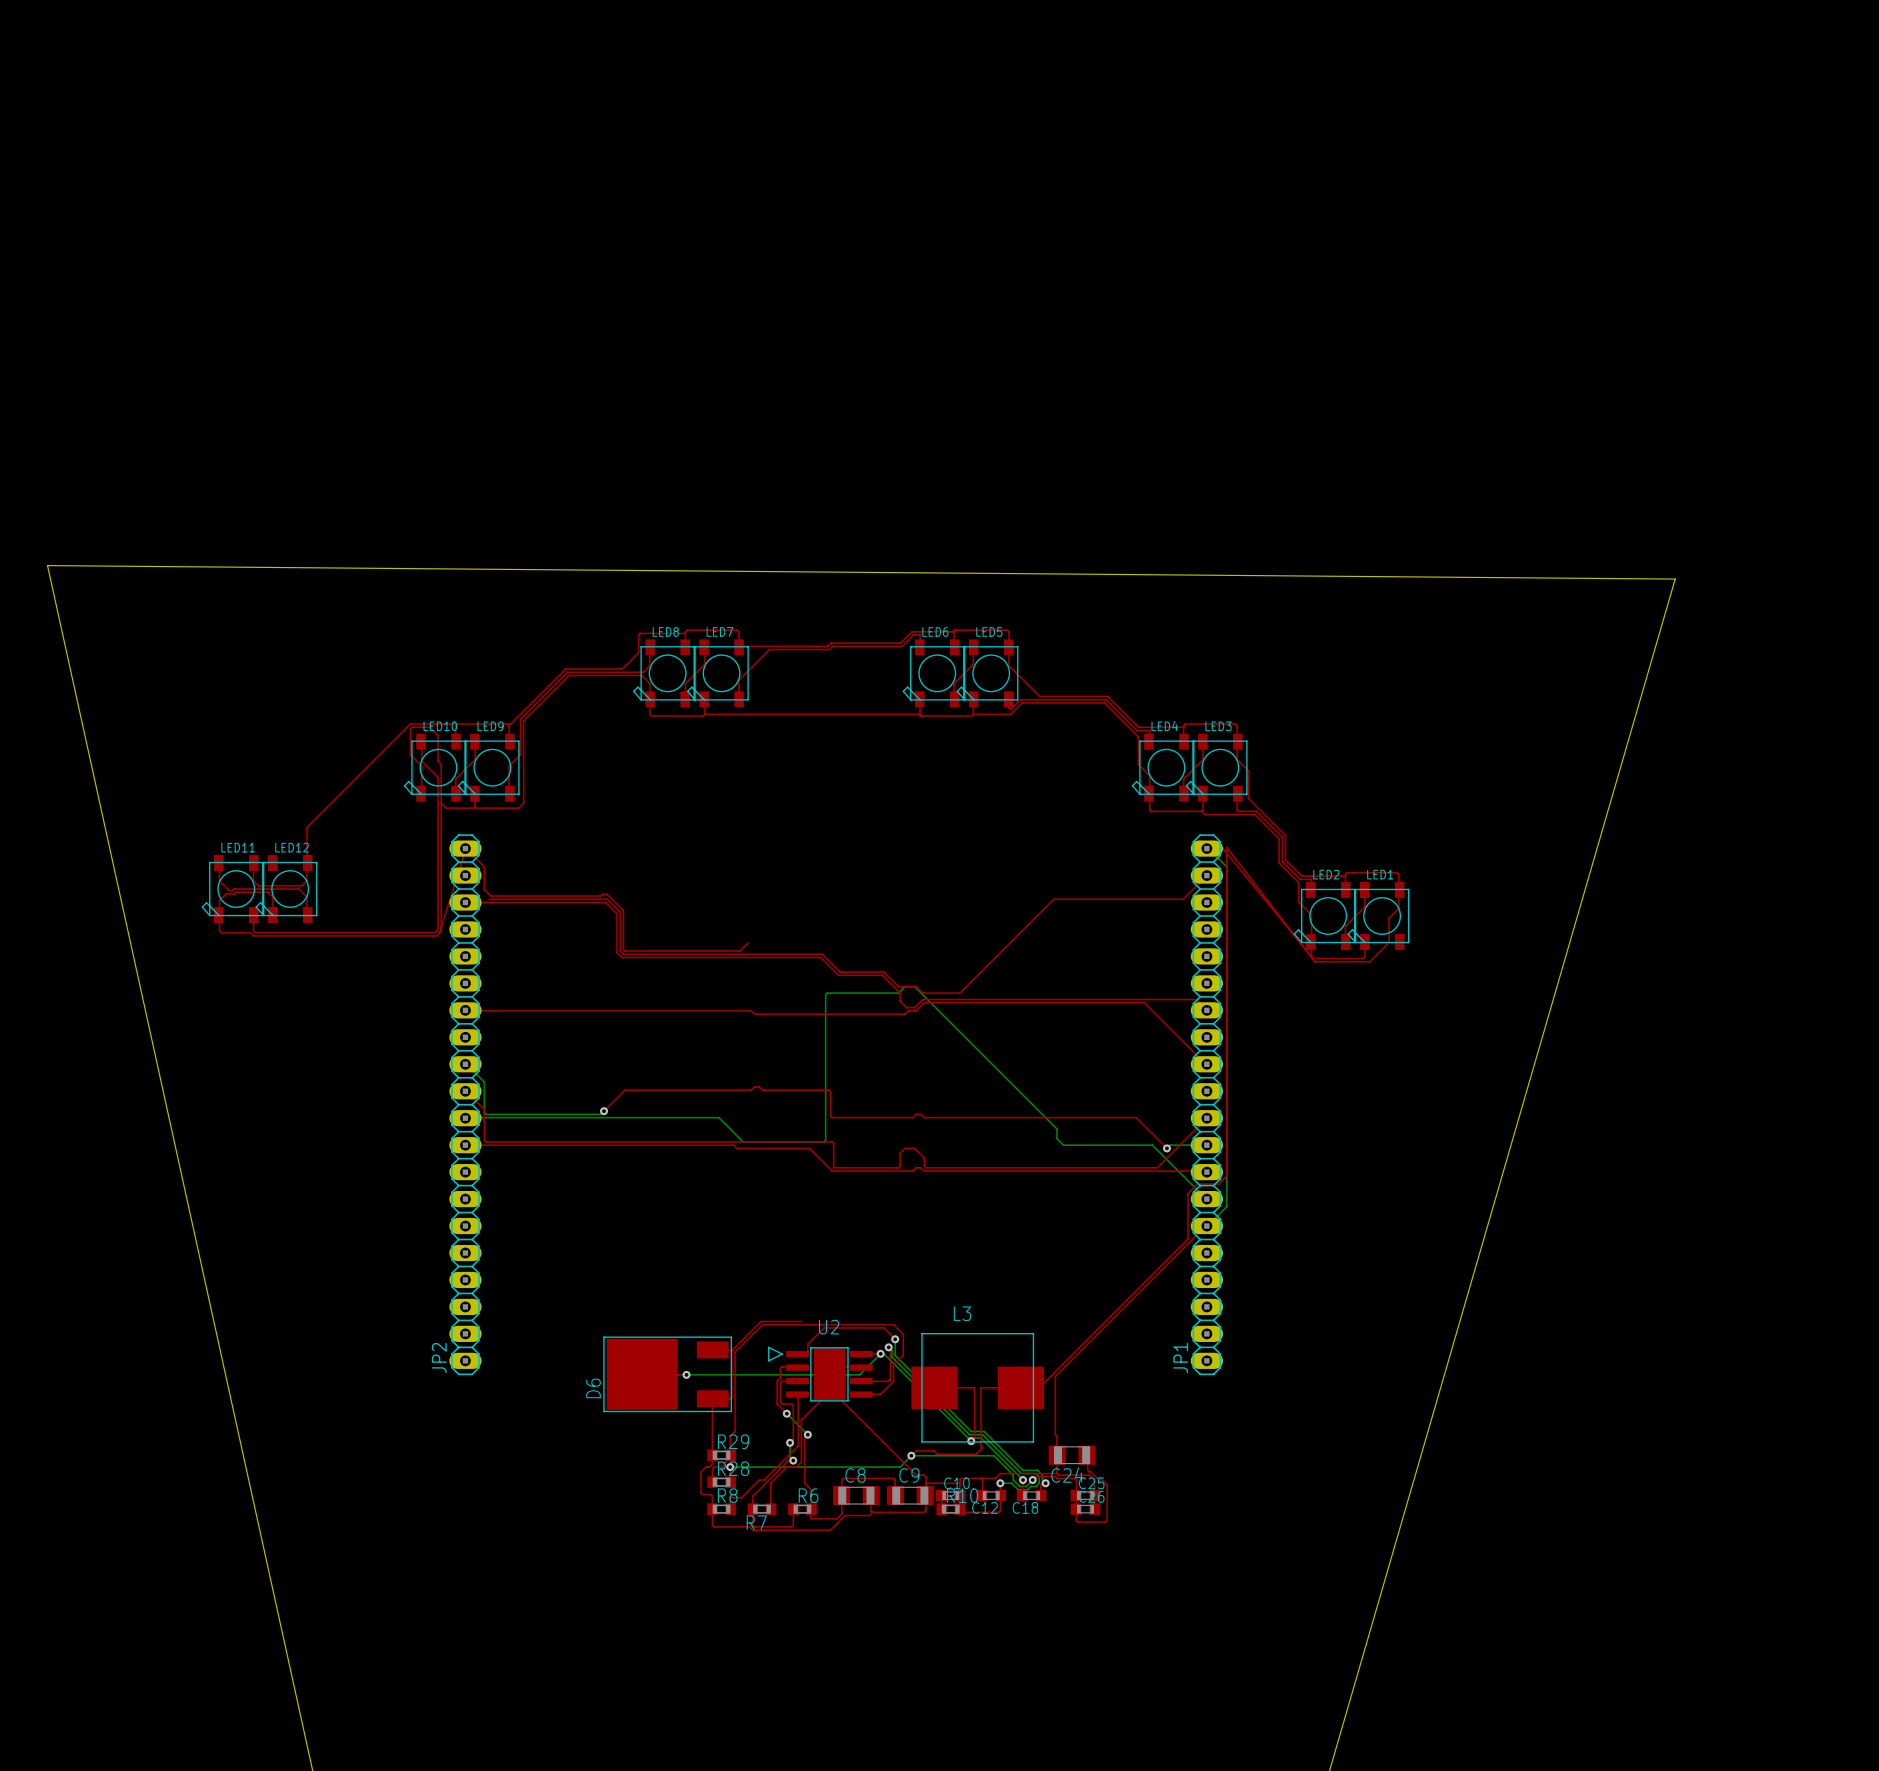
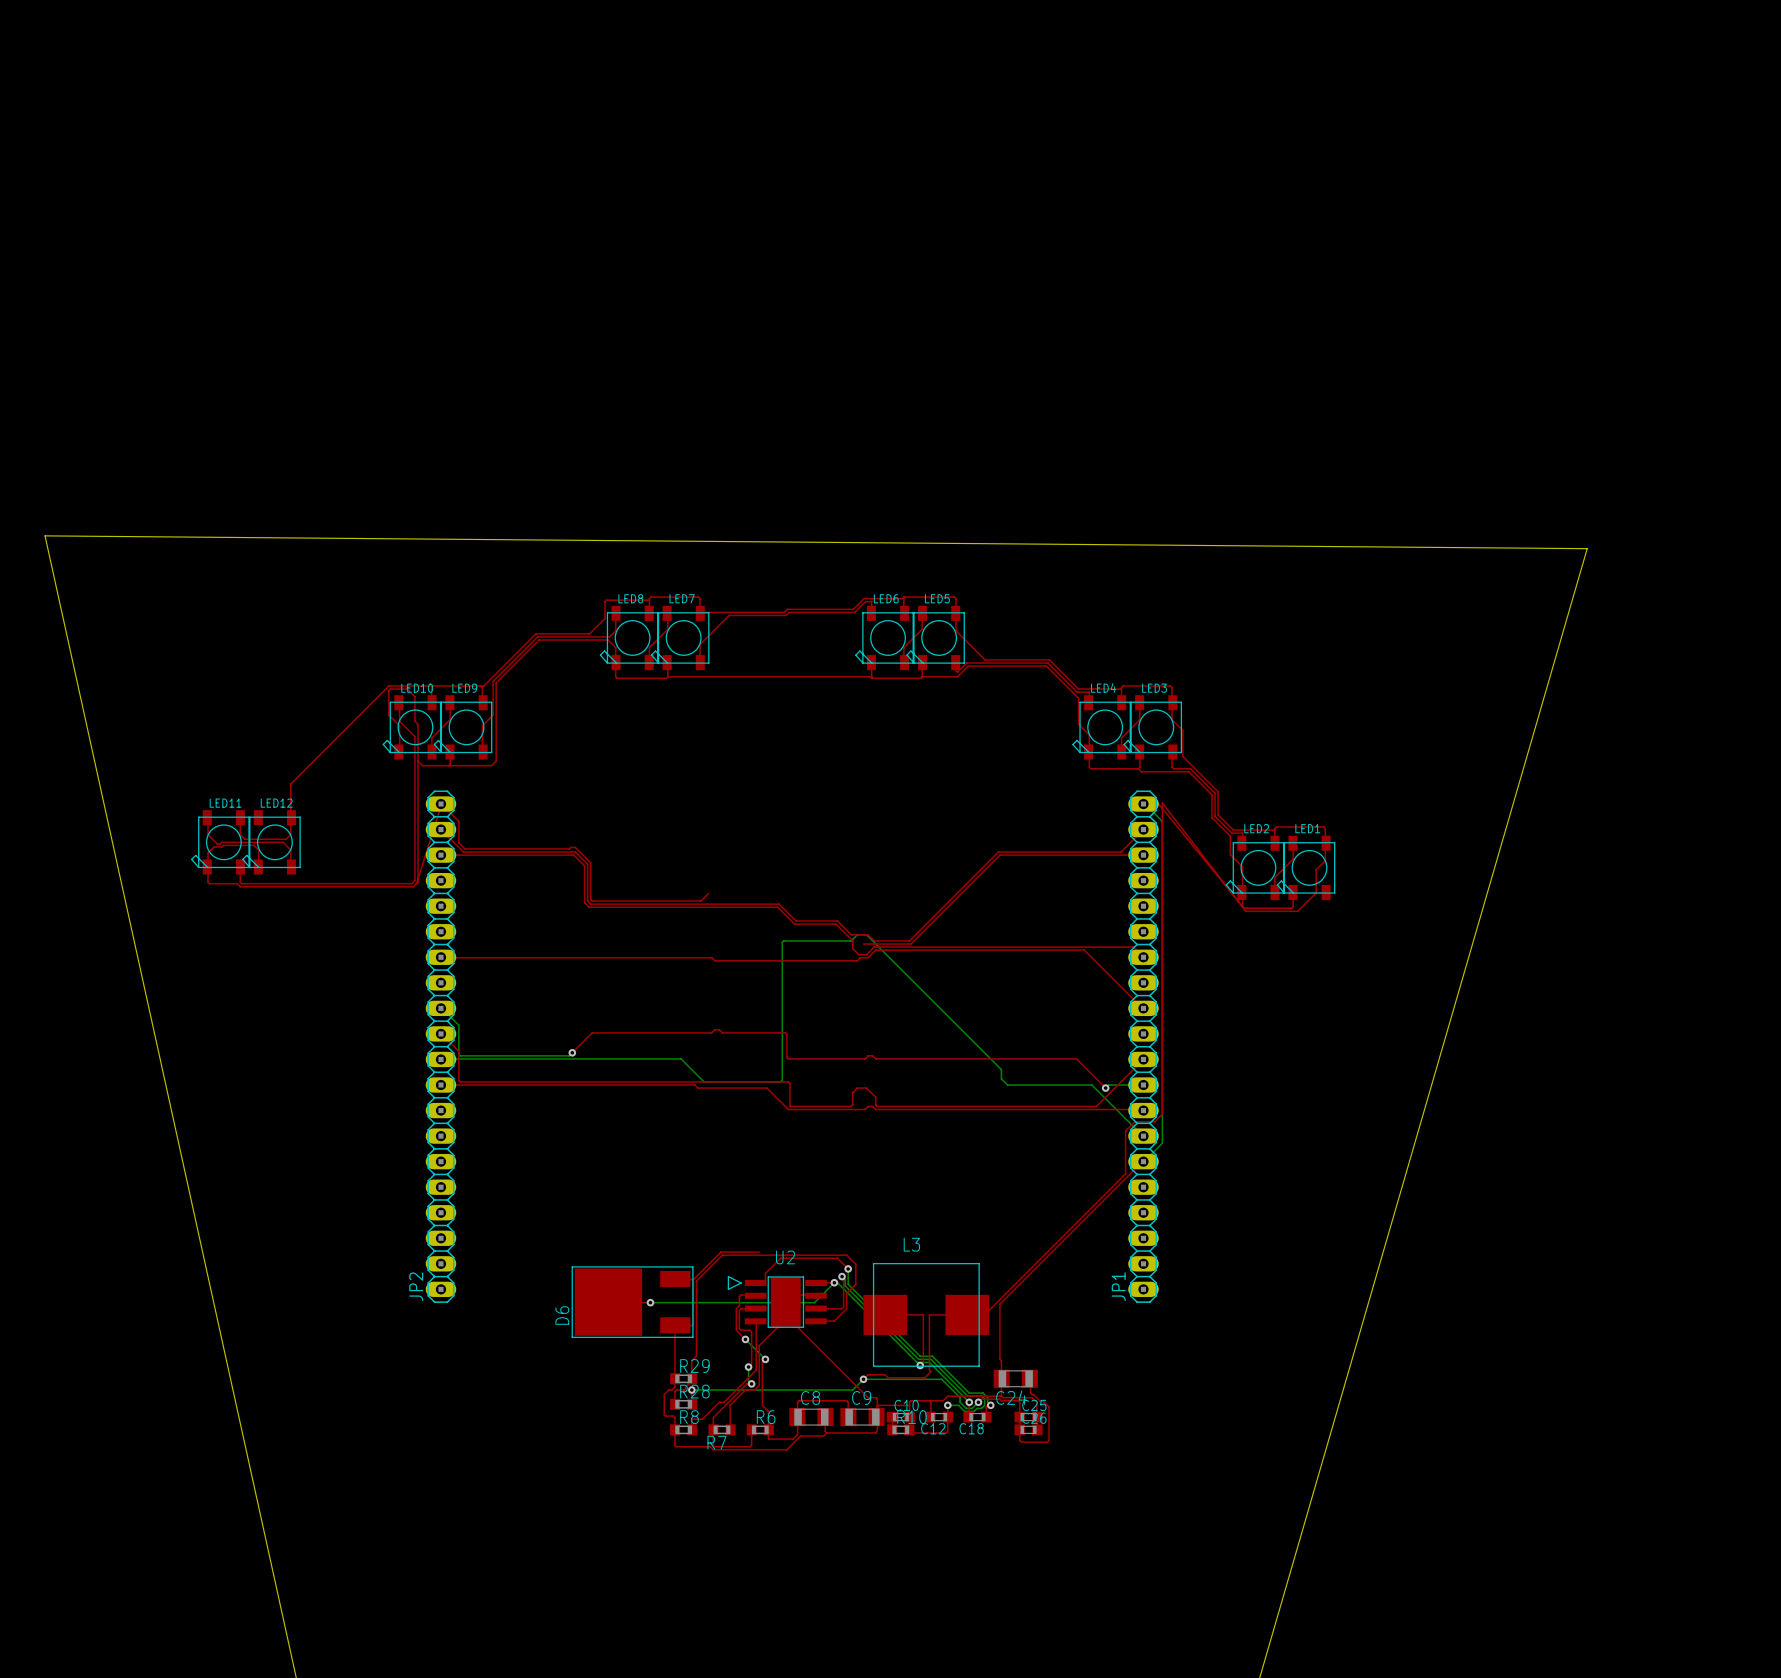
top track: none -> (440, 829) (463, 852)
top track: none -> (1143, 855) (999, 855) (911, 944) (863, 944)

